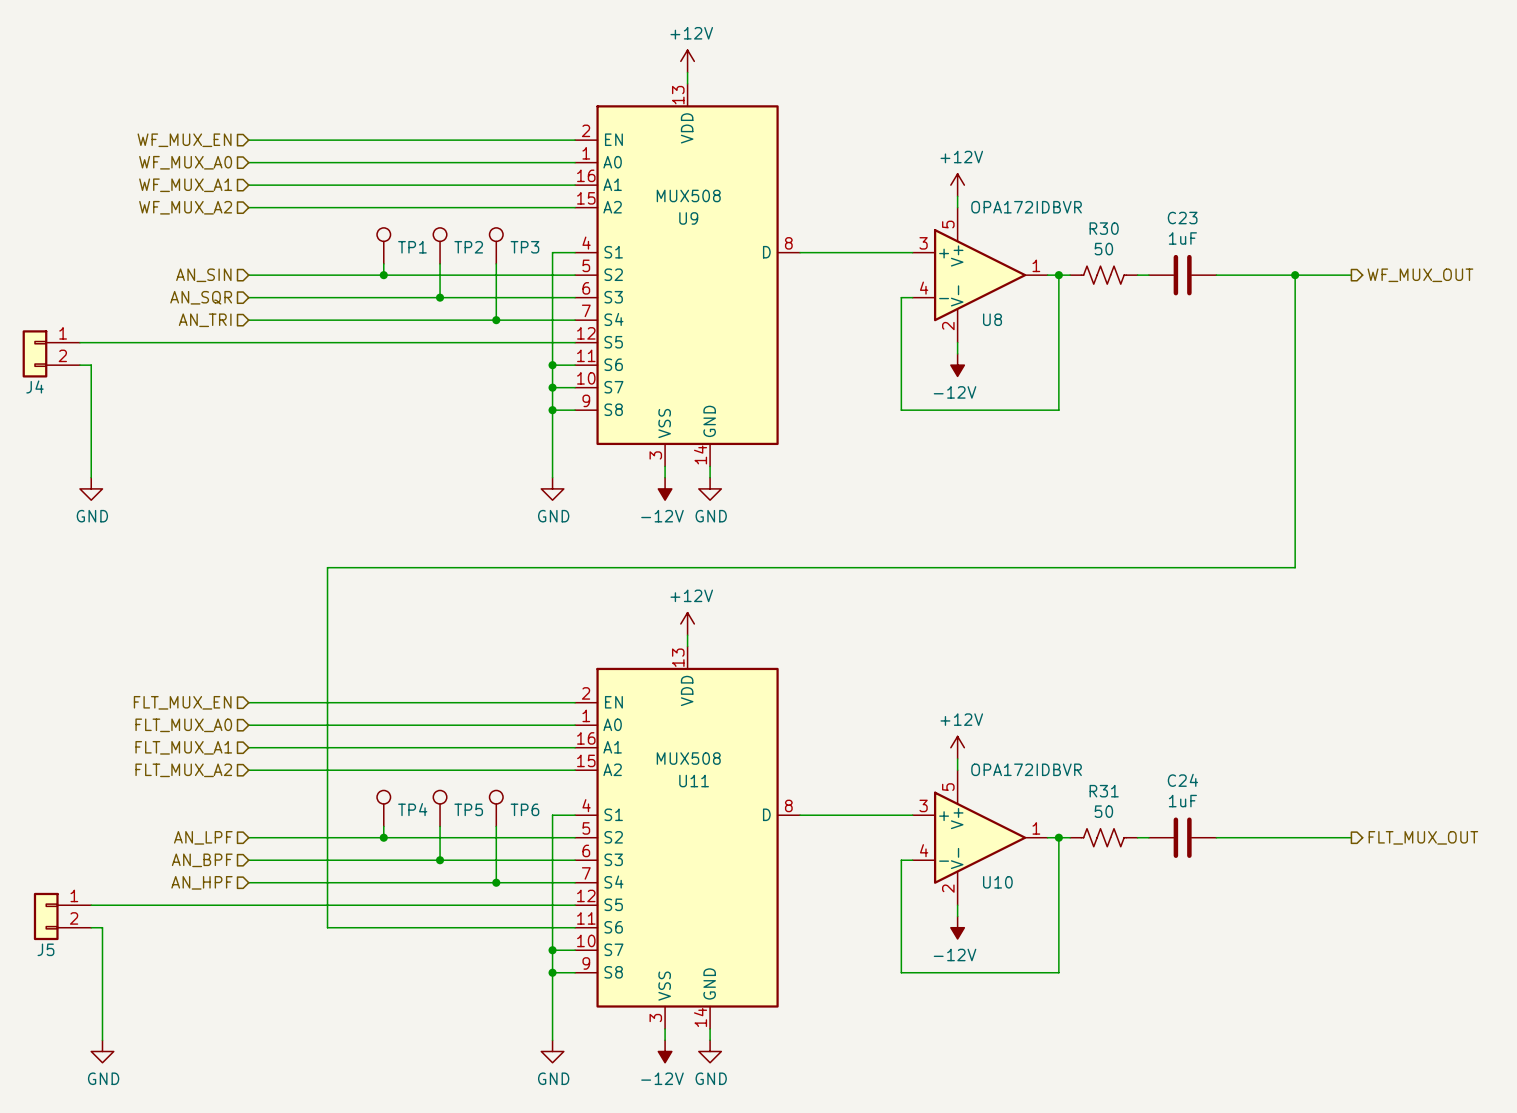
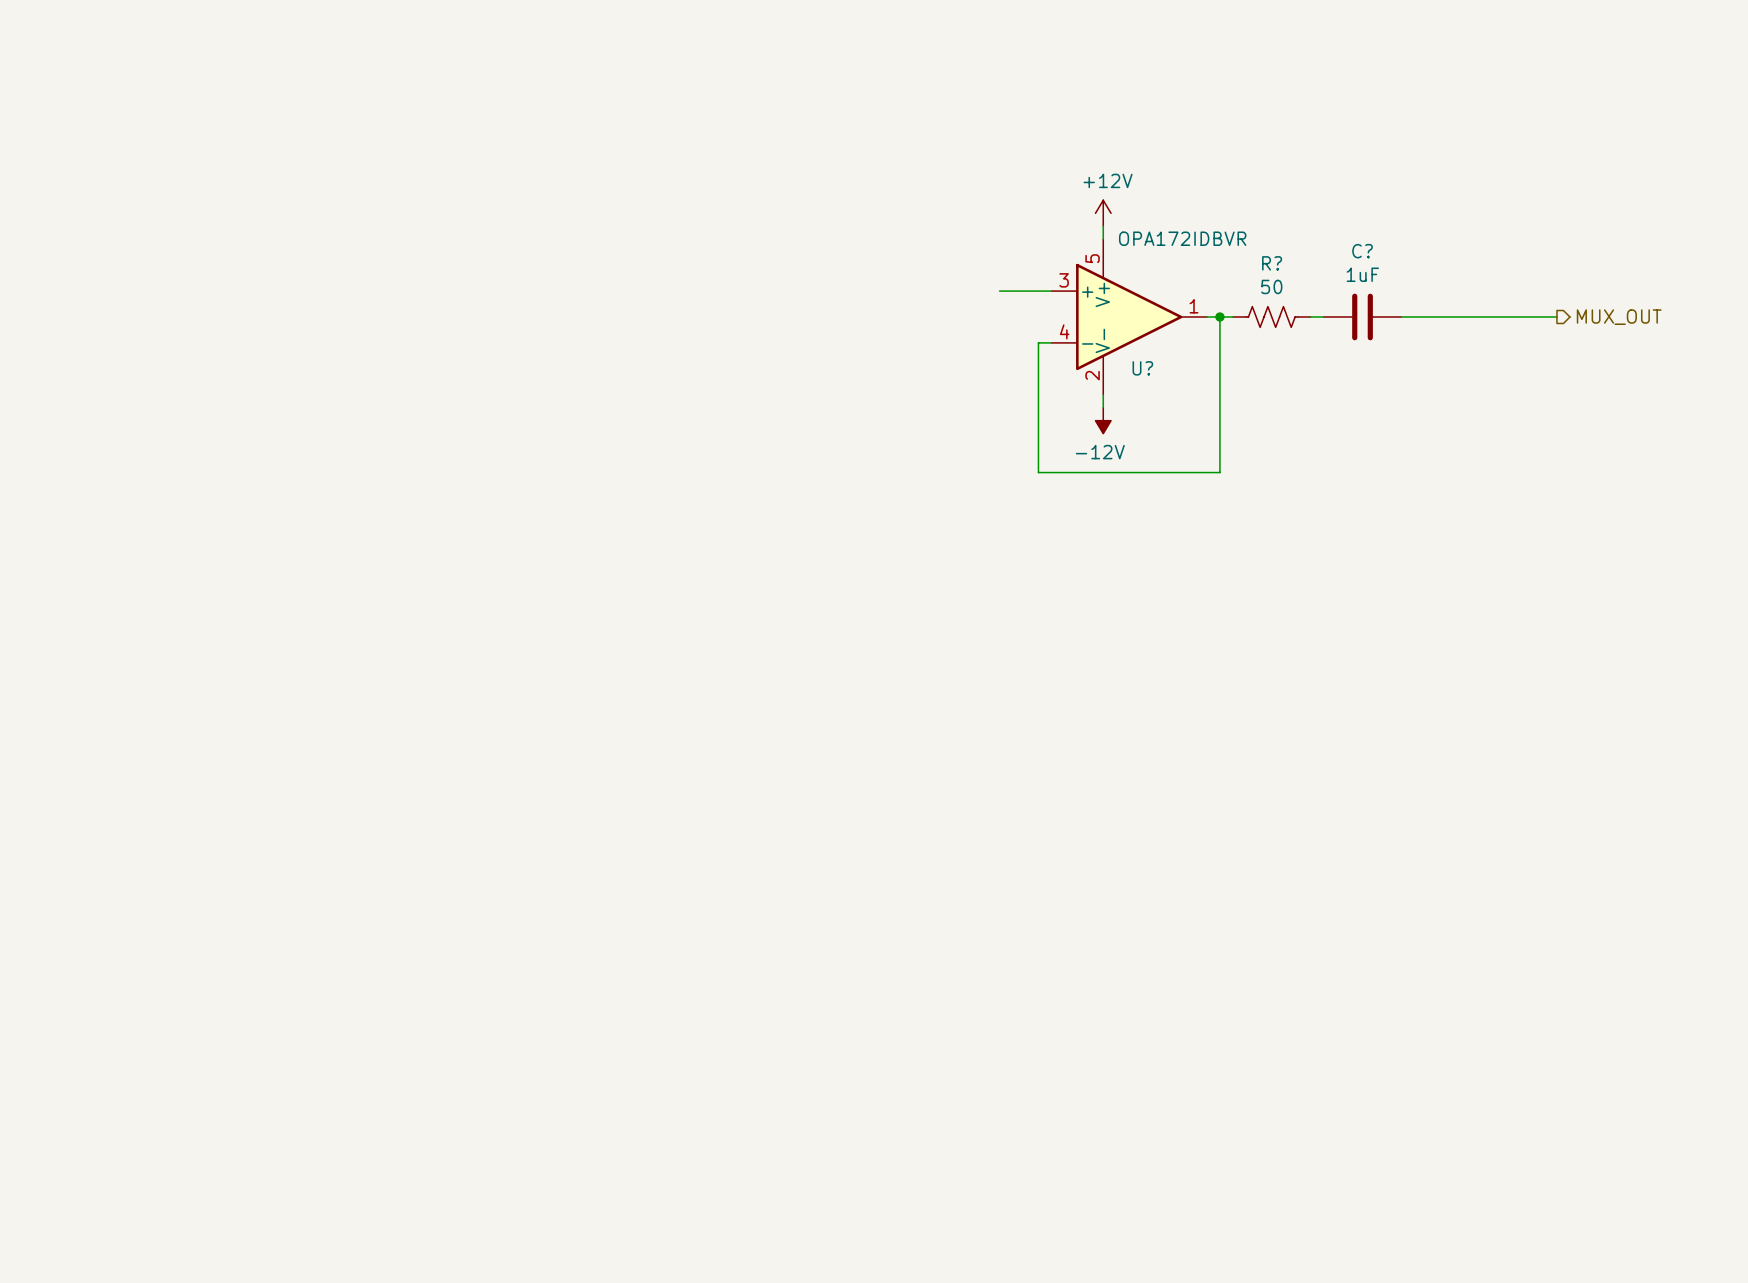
power symbol: +12V (687, 61) -> none
wire: (687, 72) (687, 83) -> none
hierarchical label: WF_MUX_EN (184, 140) -> none
wire: (248, 140) (575, 140) -> none
hierarchical label: WF_MUX_A0 (185, 162) -> none
wire: (248, 162) (575, 162) -> none
hierarchical label: WF_MUX_A1 (185, 185) -> none
wire: (248, 185) (575, 185) -> none
hierarchical label: WF_MUX_A2 (185, 207) -> none
wire: (248, 207) (575, 207) -> none
C23 name: C23 (1182, 218) -> C? (1362, 251)
R30 name: R30 (1104, 228) -> R? (1272, 263)
TP1: (383, 245) -> none
TP2: (440, 245) -> none
TP3: (496, 245) -> none
wire: (575, 252) (552, 252) (552, 477) -> none
wire: (800, 252) (867, 252) -> none
wire: (383, 263) (383, 275) -> none
wire: (440, 263) (440, 297) -> none
wire: (496, 263) (496, 320) -> none
hierarchical label: AN_SIN (203, 275) -> none
wire: (248, 275) (575, 275) -> none
junction: (383, 275) -> none
U9: MUX508 (687, 275) -> none
wire: (1295, 275) (1295, 567) (327, 567) (327, 927) (575, 927) -> none
junction: (1295, 275) -> none
hierarchical label: WF_MUX_OUT (1420, 275) -> MUX_OUT (1619, 317)
hierarchical label: AN_SQR (201, 297) -> none
wire: (248, 297) (575, 297) -> none
junction: (440, 297) -> none
U8 name: U8 (992, 319) -> U? (1142, 368)
hierarchical label: AN_TRI (205, 320) -> none
wire: (248, 320) (575, 320) -> none
junction: (496, 320) -> none
wire: (79, 342) (575, 342) -> none
J4: (51, 353) -> none
wire: (79, 365) (91, 365) (91, 477) -> none
wire: (552, 365) (575, 365) -> none
junction: (552, 365) -> none
wire: (552, 387) (575, 387) -> none
junction: (552, 387) -> none
wire: (552, 410) (575, 410) -> none
junction: (552, 410) -> none
wire: (665, 466) (665, 477) -> none
wire: (710, 466) (710, 477) -> none
power symbol: GND (91, 488) -> none
power symbol: GND (552, 488) -> none
power symbol: -12V (665, 488) -> none
power symbol: GND (710, 488) -> none
power symbol: +12V (687, 623) -> none
wire: (687, 635) (687, 646) -> none
hierarchical label: FLT_MUX_EN (182, 702) -> none
wire: (248, 702) (575, 702) -> none
hierarchical label: FLT_MUX_A0 (183, 725) -> none
wire: (248, 725) (575, 725) -> none
hierarchical label: FLT_MUX_A1 (183, 747) -> none
wire: (248, 747) (575, 747) -> none
power symbol: +12V (957, 747) -> none
wire: (957, 758) (957, 770) -> none
hierarchical label: FLT_MUX_A2 (183, 770) -> none
wire: (248, 770) (575, 770) -> none
TP4: (383, 808) -> none
TP5: (440, 808) -> none
TP6: (496, 808) -> none
wire: (575, 815) (552, 815) (552, 1040) -> none
wire: (800, 815) (912, 815) -> none
wire: (383, 826) (383, 837) -> none
wire: (440, 826) (440, 860) -> none
wire: (496, 826) (496, 882) -> none
hierarchical label: AN_LPF (203, 837) -> none
wire: (248, 837) (575, 837) -> none
junction: (383, 837) -> none
U11: MUX508 (687, 837) -> none
U10: OPA172IDBVR (980, 837) -> none
wire: (1047, 837) (1070, 837) -> none
wire: (1058, 837) (1058, 972) (901, 972) (901, 860) (912, 860) -> none
junction: (1058, 837) -> none
R31: 50 (1103, 837) -> none
wire: (1137, 837) (1148, 837) -> none
C24: 1uF (1182, 837) -> none
wire: (1216, 837) (1351, 837) -> none
hierarchical label: FLT_MUX_OUT (1423, 837) -> none
hierarchical label: AN_BPF (202, 860) -> none
wire: (248, 860) (575, 860) -> none
junction: (440, 860) -> none
hierarchical label: AN_HPF (201, 882) -> none
wire: (248, 882) (575, 882) -> none
junction: (496, 882) -> none
wire: (91, 905) (575, 905) -> none
wire: (957, 905) (957, 916) -> none
J5: (62, 916) -> none
wire: (91, 927) (102, 927) (102, 1040) -> none
power symbol: -12V (957, 927) -> none
wire: (552, 950) (575, 950) -> none
junction: (552, 950) -> none
wire: (552, 972) (575, 972) -> none
junction: (552, 972) -> none
wire: (665, 1029) (665, 1040) -> none
wire: (710, 1029) (710, 1040) -> none
power symbol: GND (102, 1051) -> none
power symbol: GND (552, 1051) -> none
power symbol: -12V (665, 1051) -> none
power symbol: GND (710, 1051) -> none

